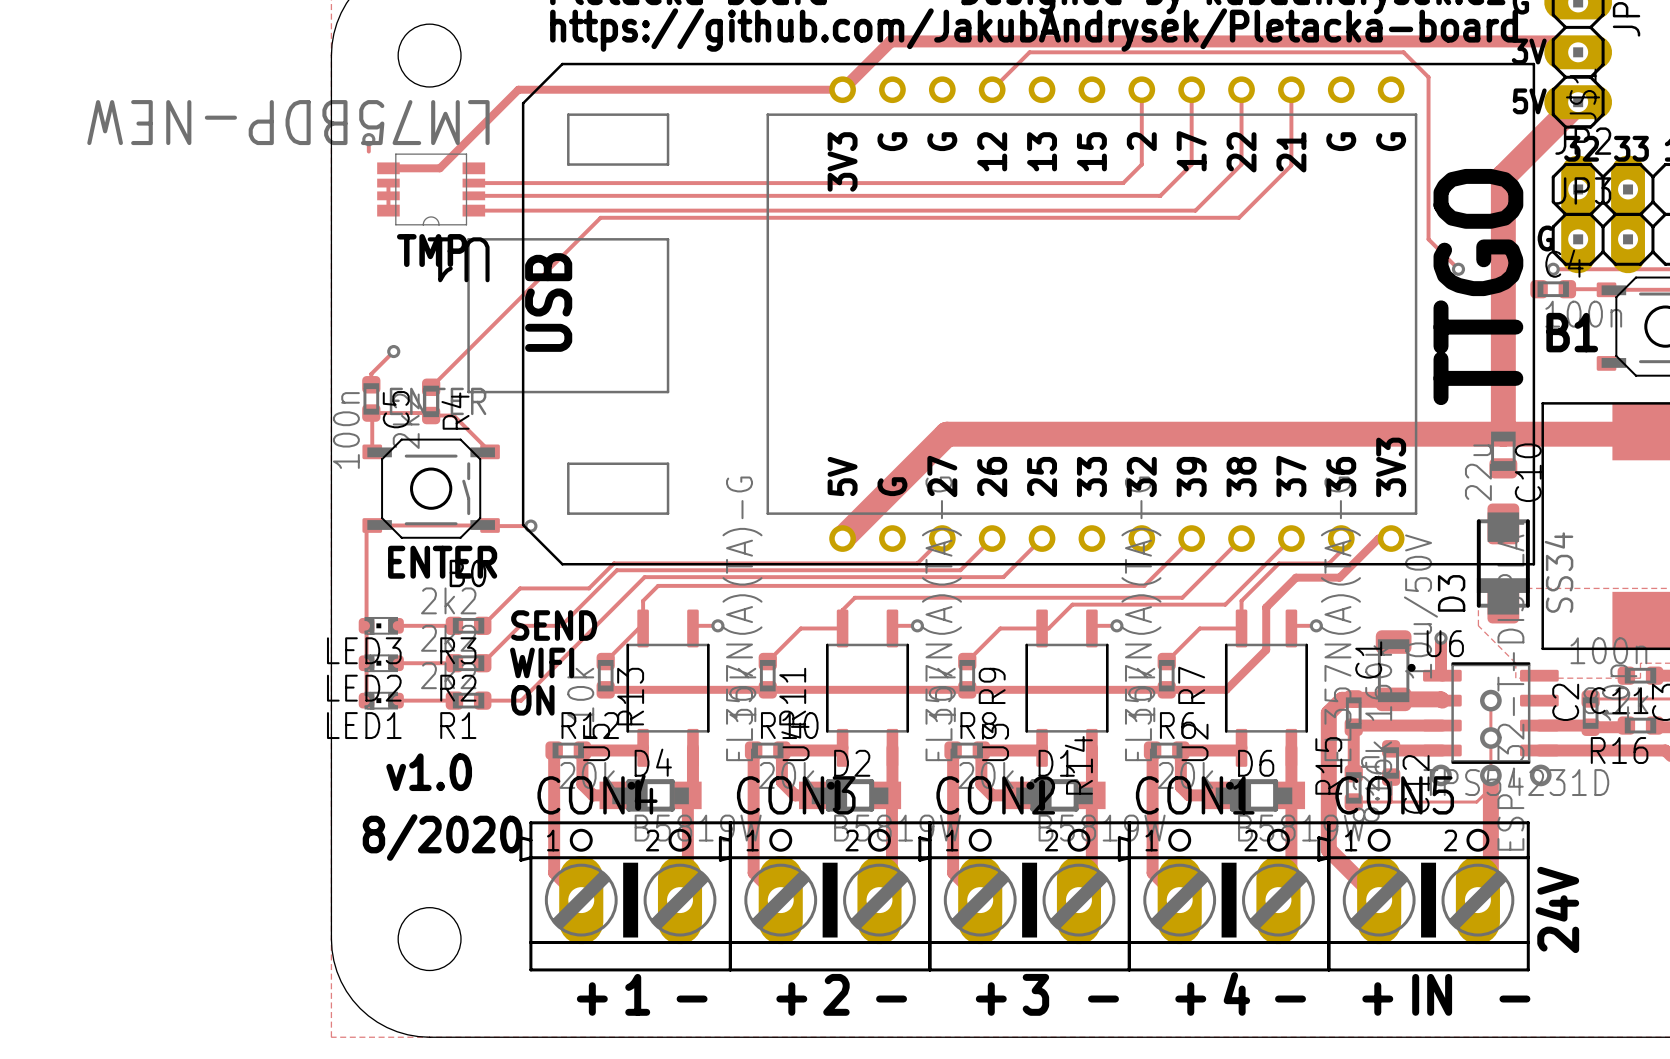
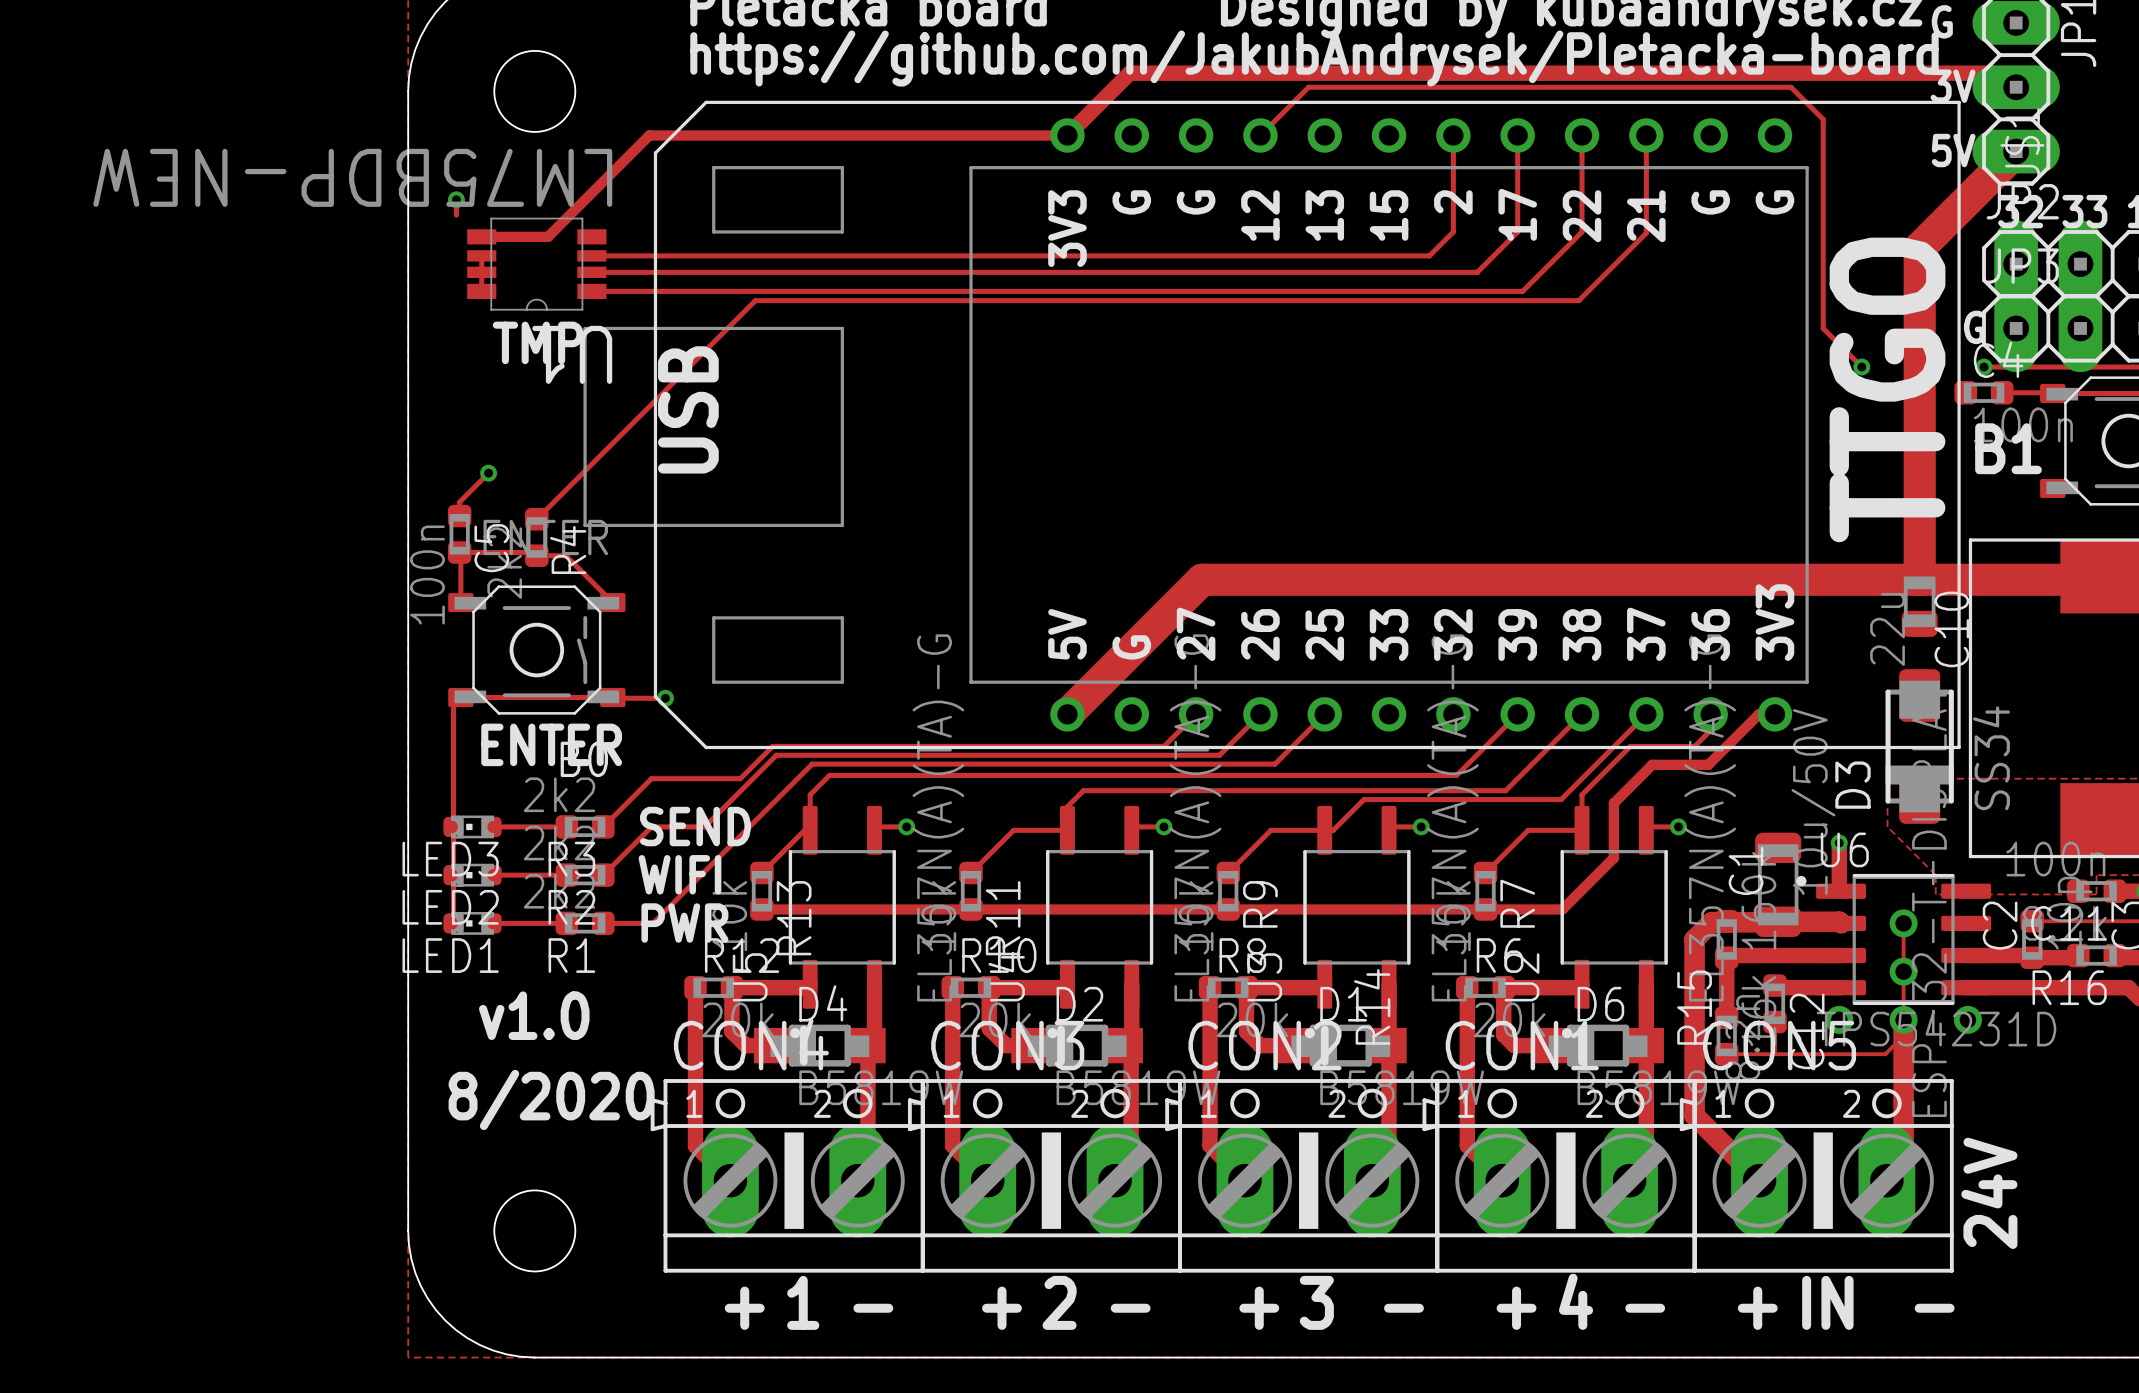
text: ON (532, 700) -> PWR (684, 923)

